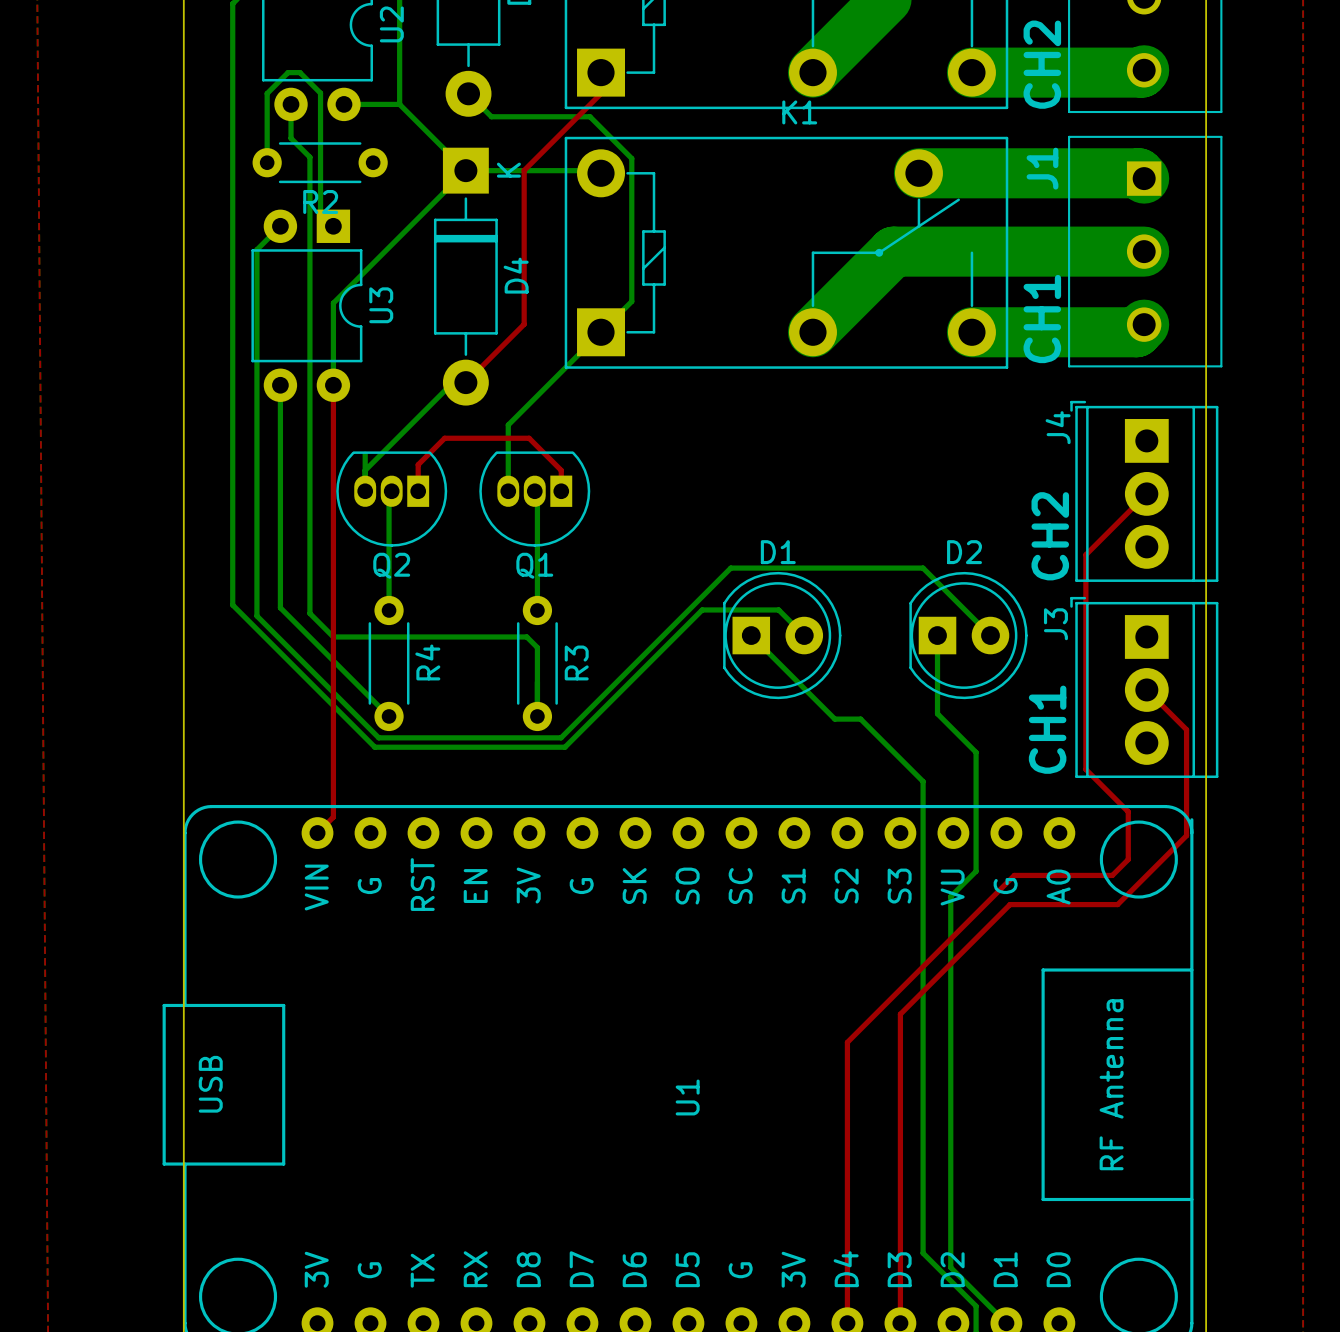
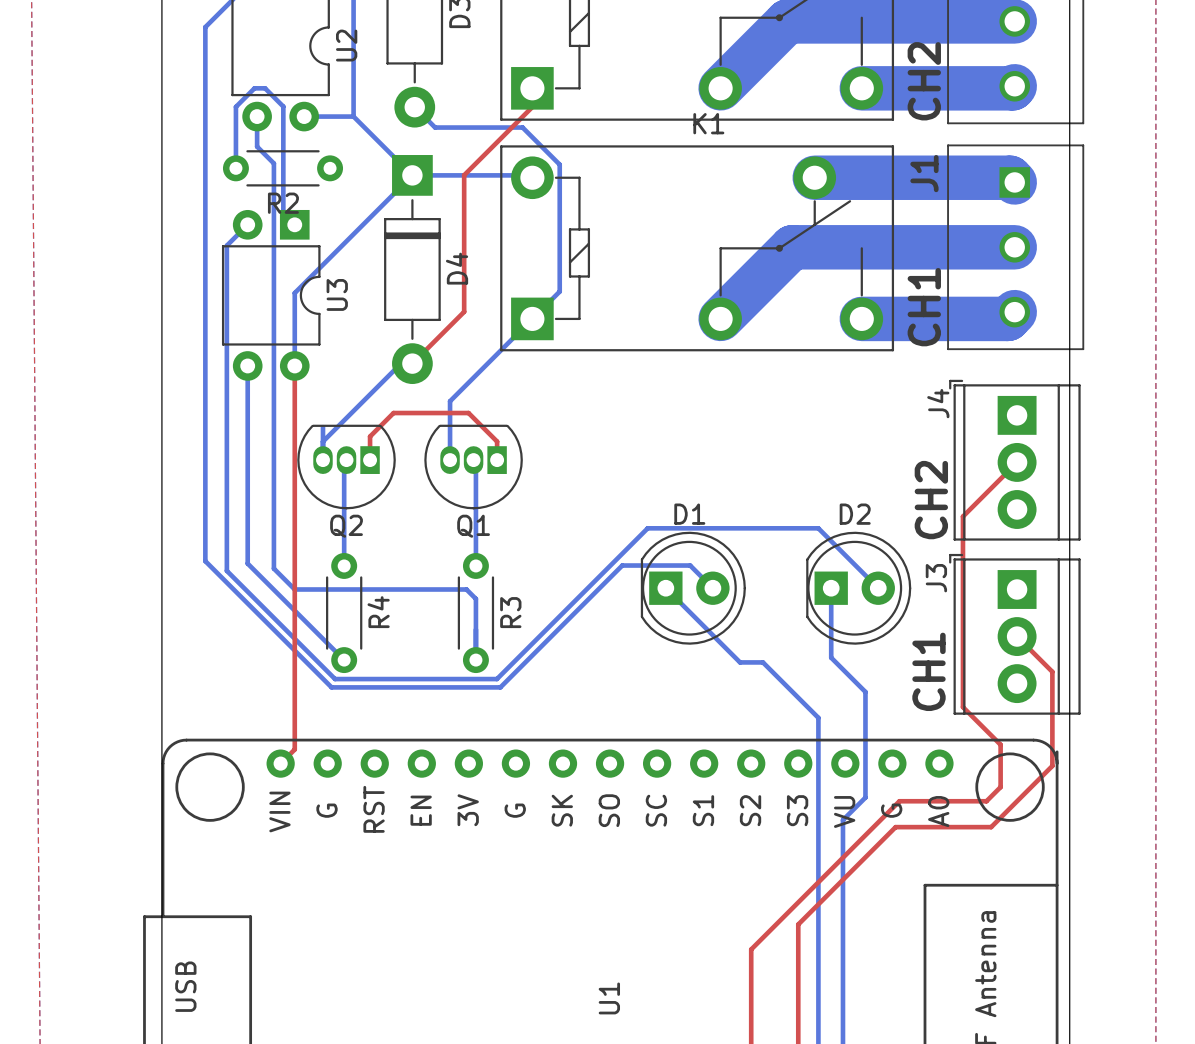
D4 text: K (508, 170) -> none

